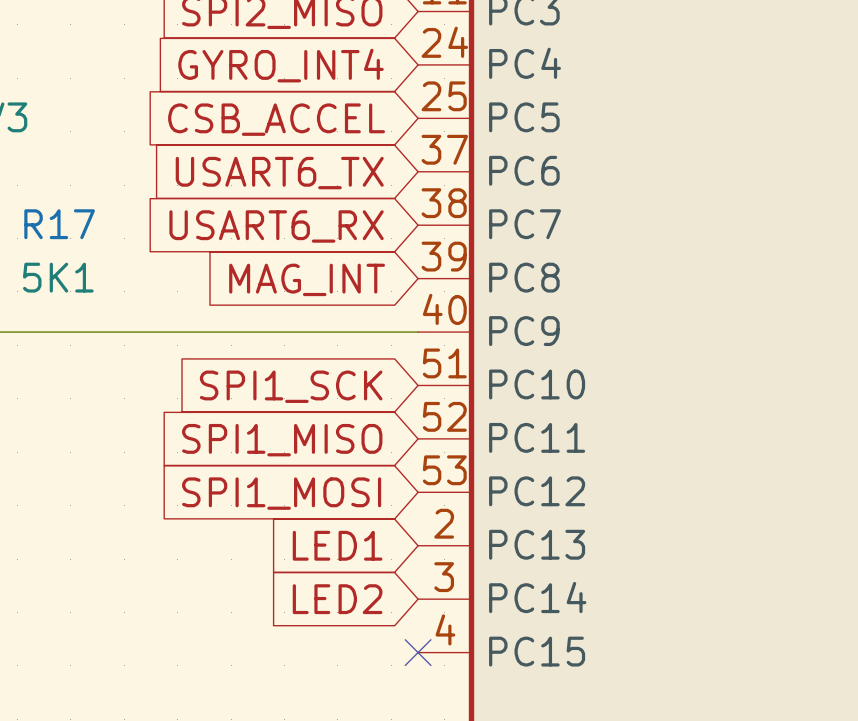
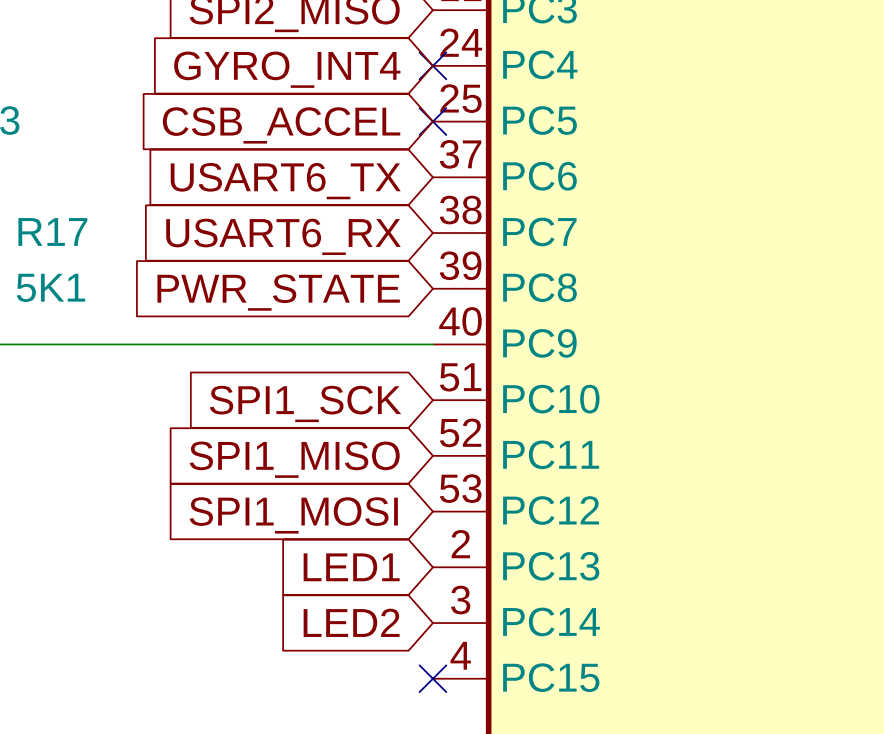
no-connect mark: none -> (432, 65)
no-connect mark: none -> (432, 121)
global label: MAG_INT (307, 279) -> PWR_STATE (278, 292)

